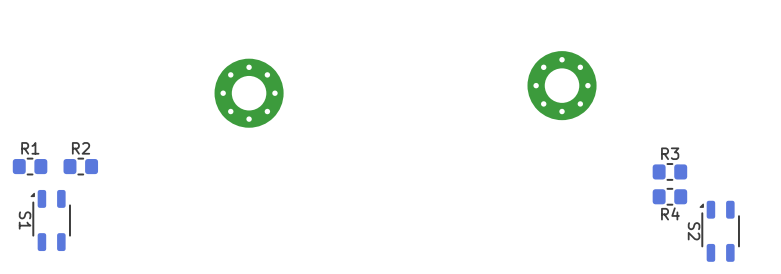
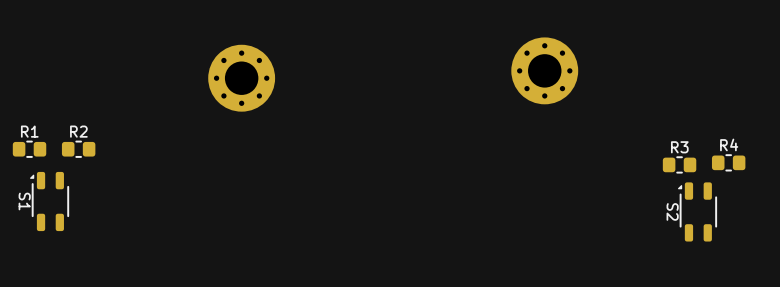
R3 position: (669, 171) -> (679, 164)
R4 position: (669, 196) -> (728, 162)
R4 name position: R4 (670, 213) -> R4 (729, 144)

